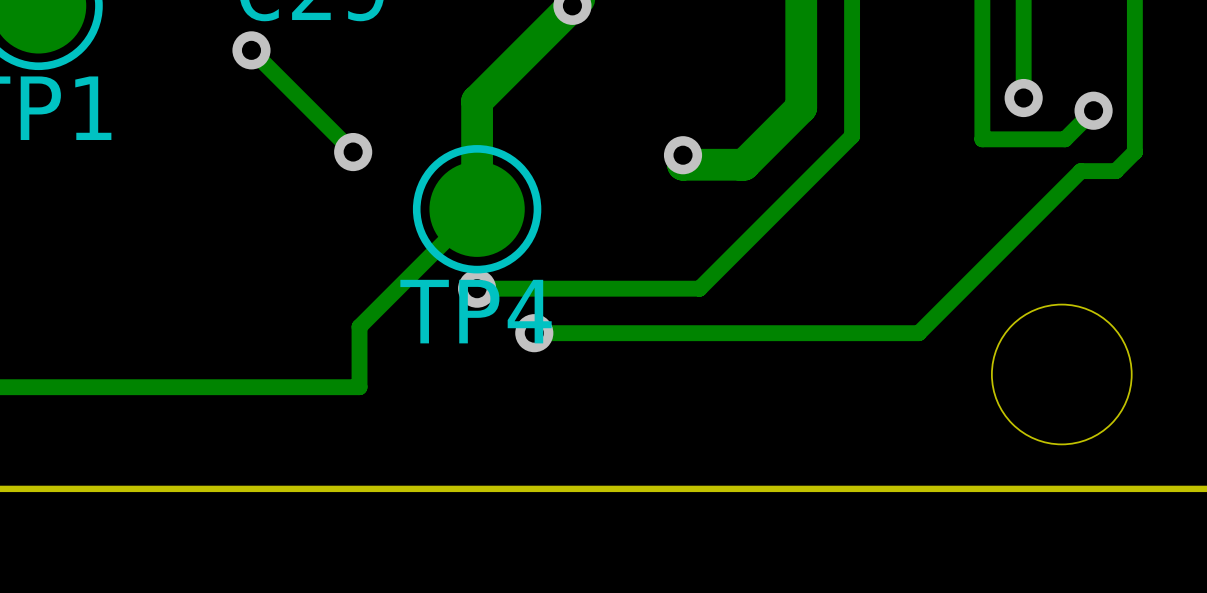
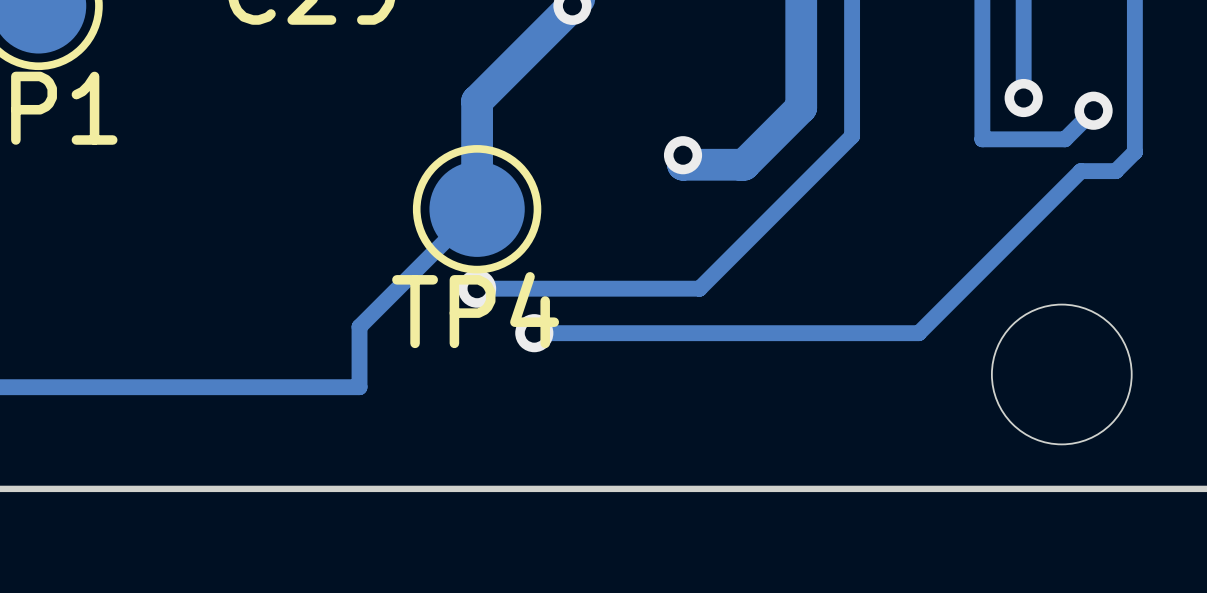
track: (251, 50) (353, 152) -> none
via: (251, 50) -> none
via: (353, 152) -> none

